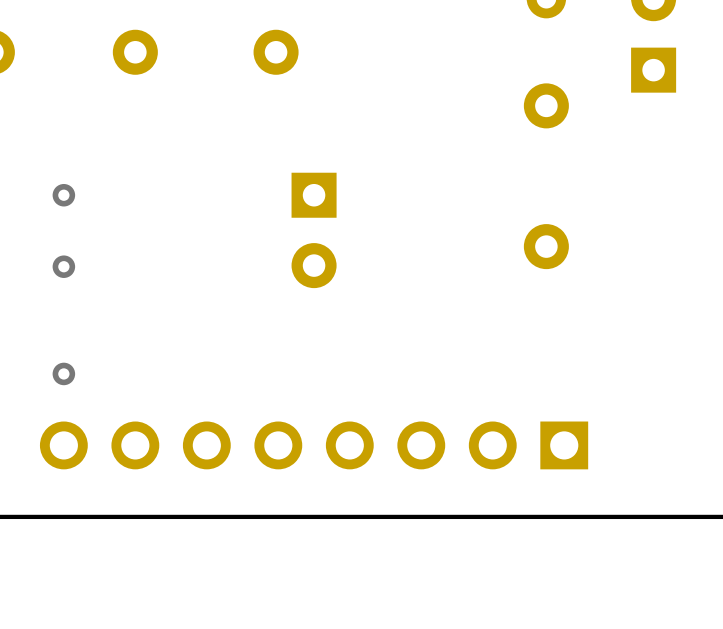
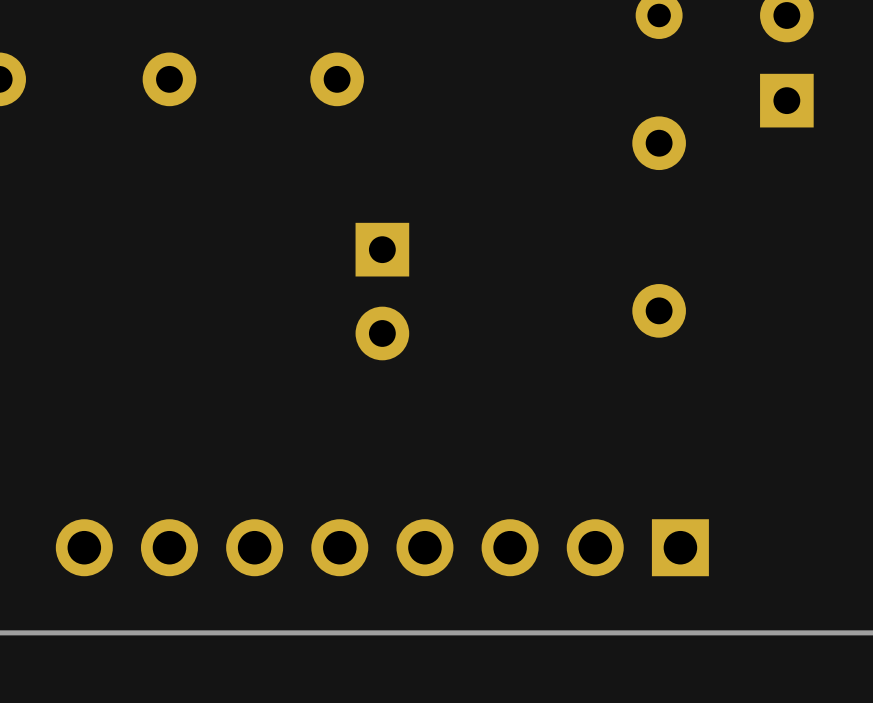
via: (63, 195) -> none
via: (63, 266) -> none
via: (63, 373) -> none

